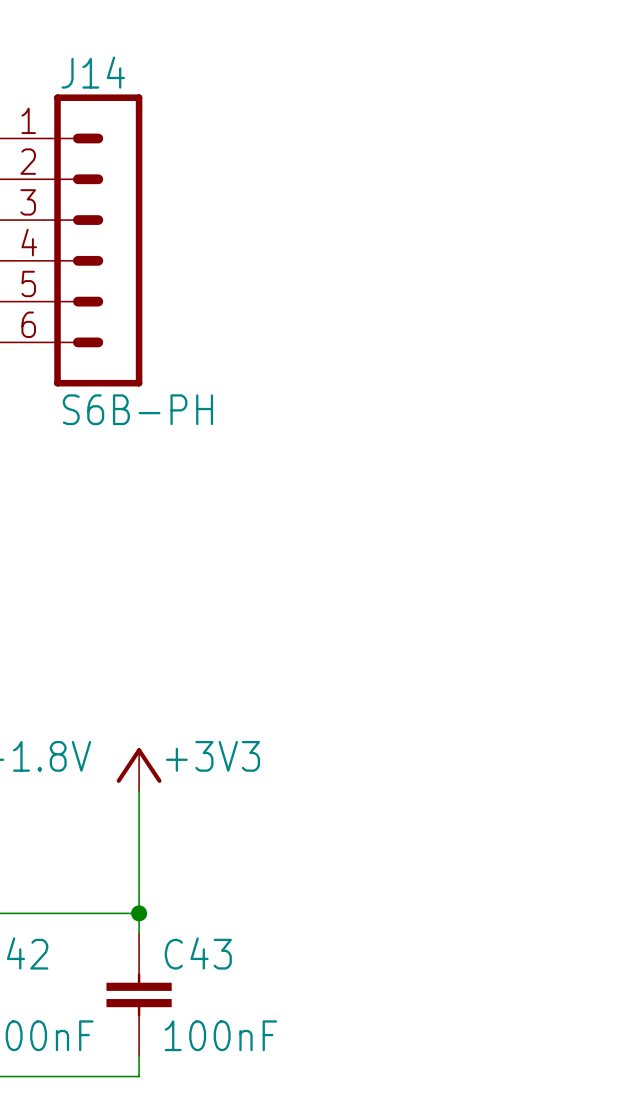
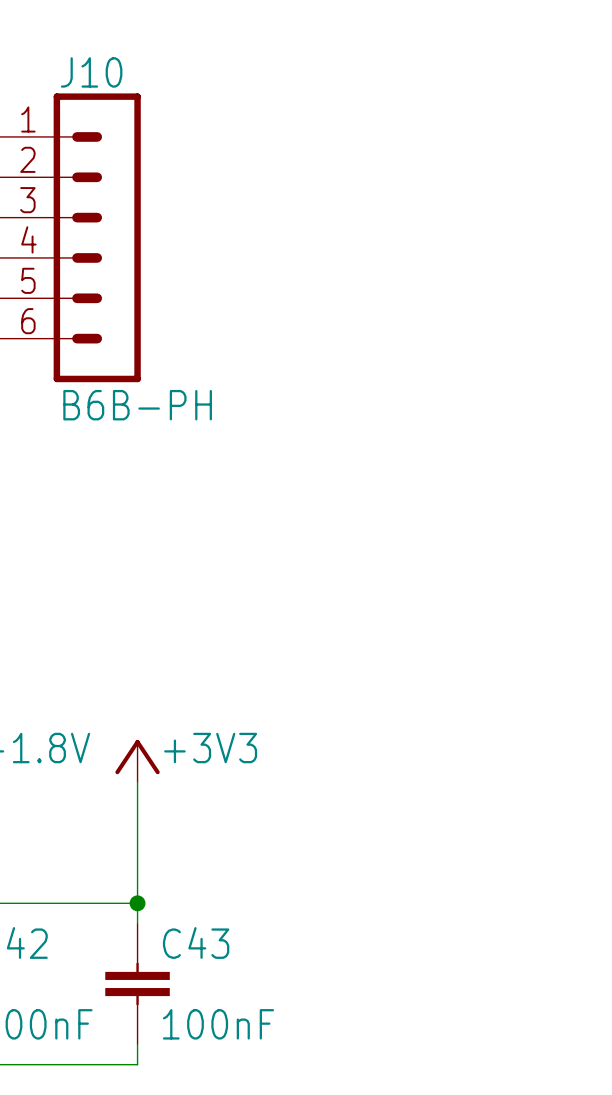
J14 name: J14 (93, 72) -> J10 (91, 72)
J14 value: S6B-PH (137, 409) -> B6B-PH (137, 405)

